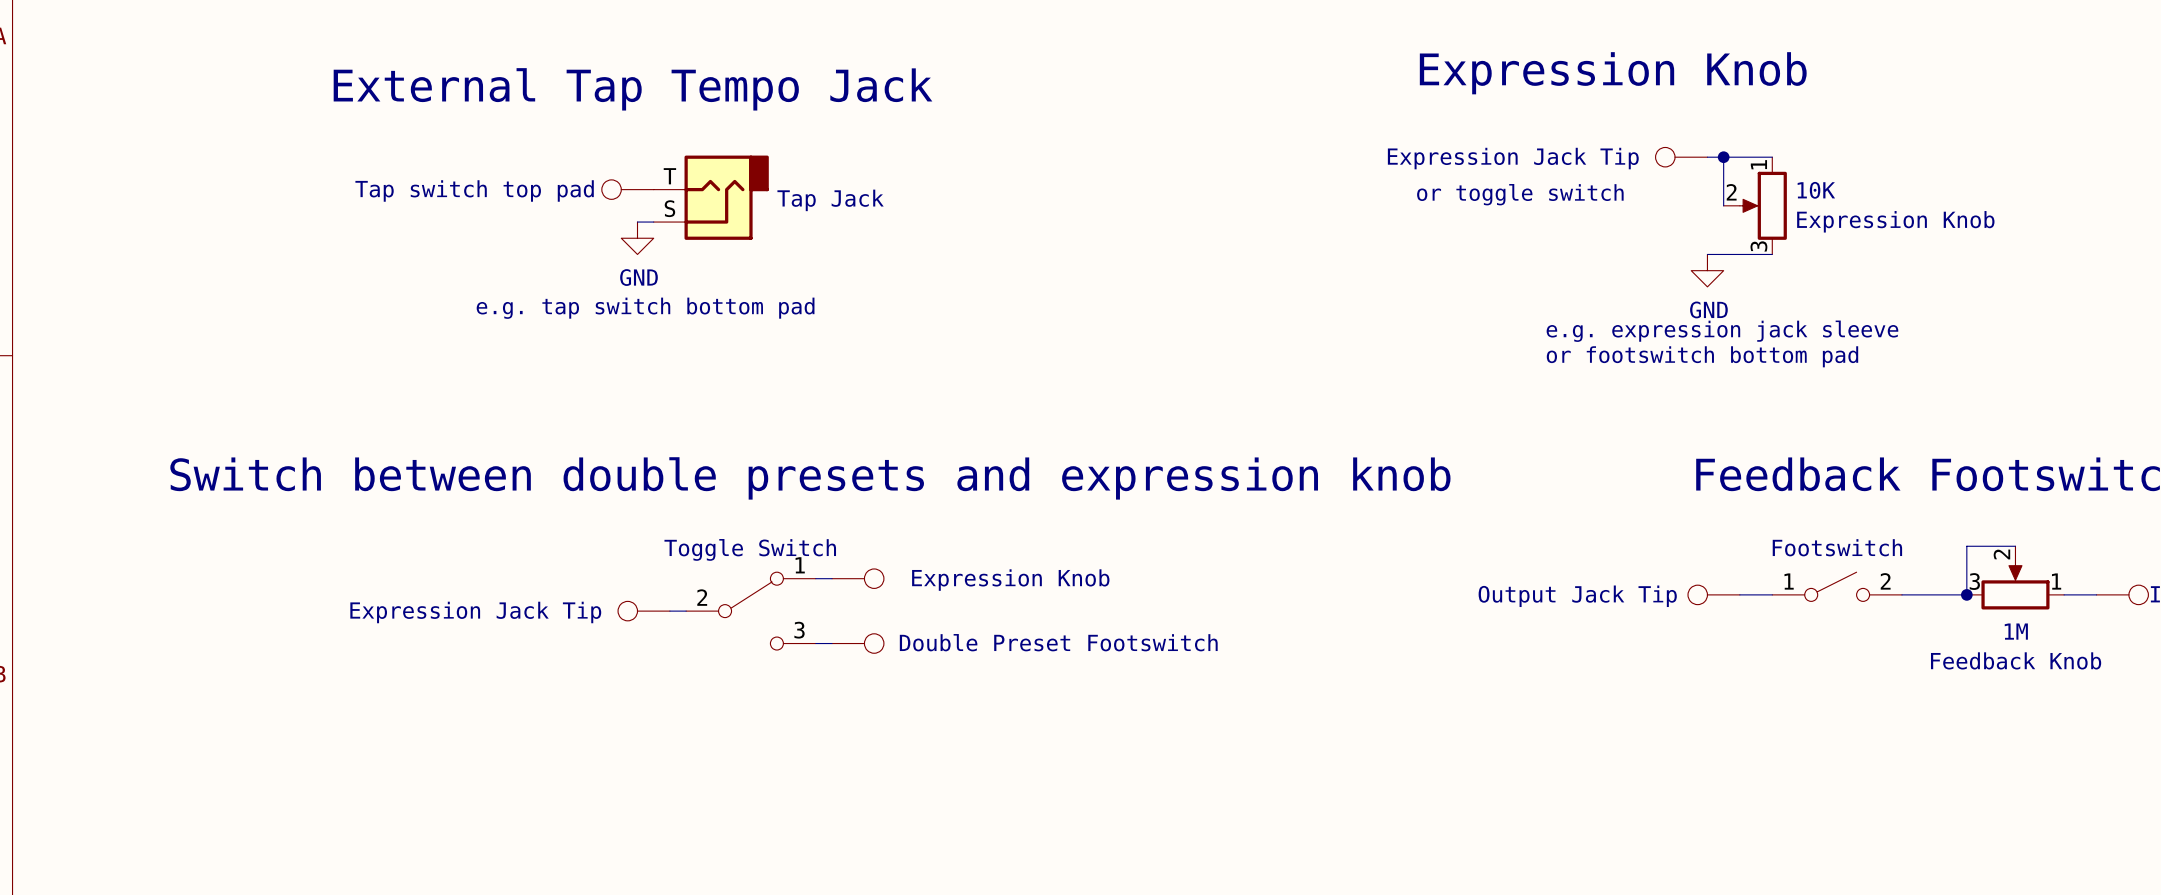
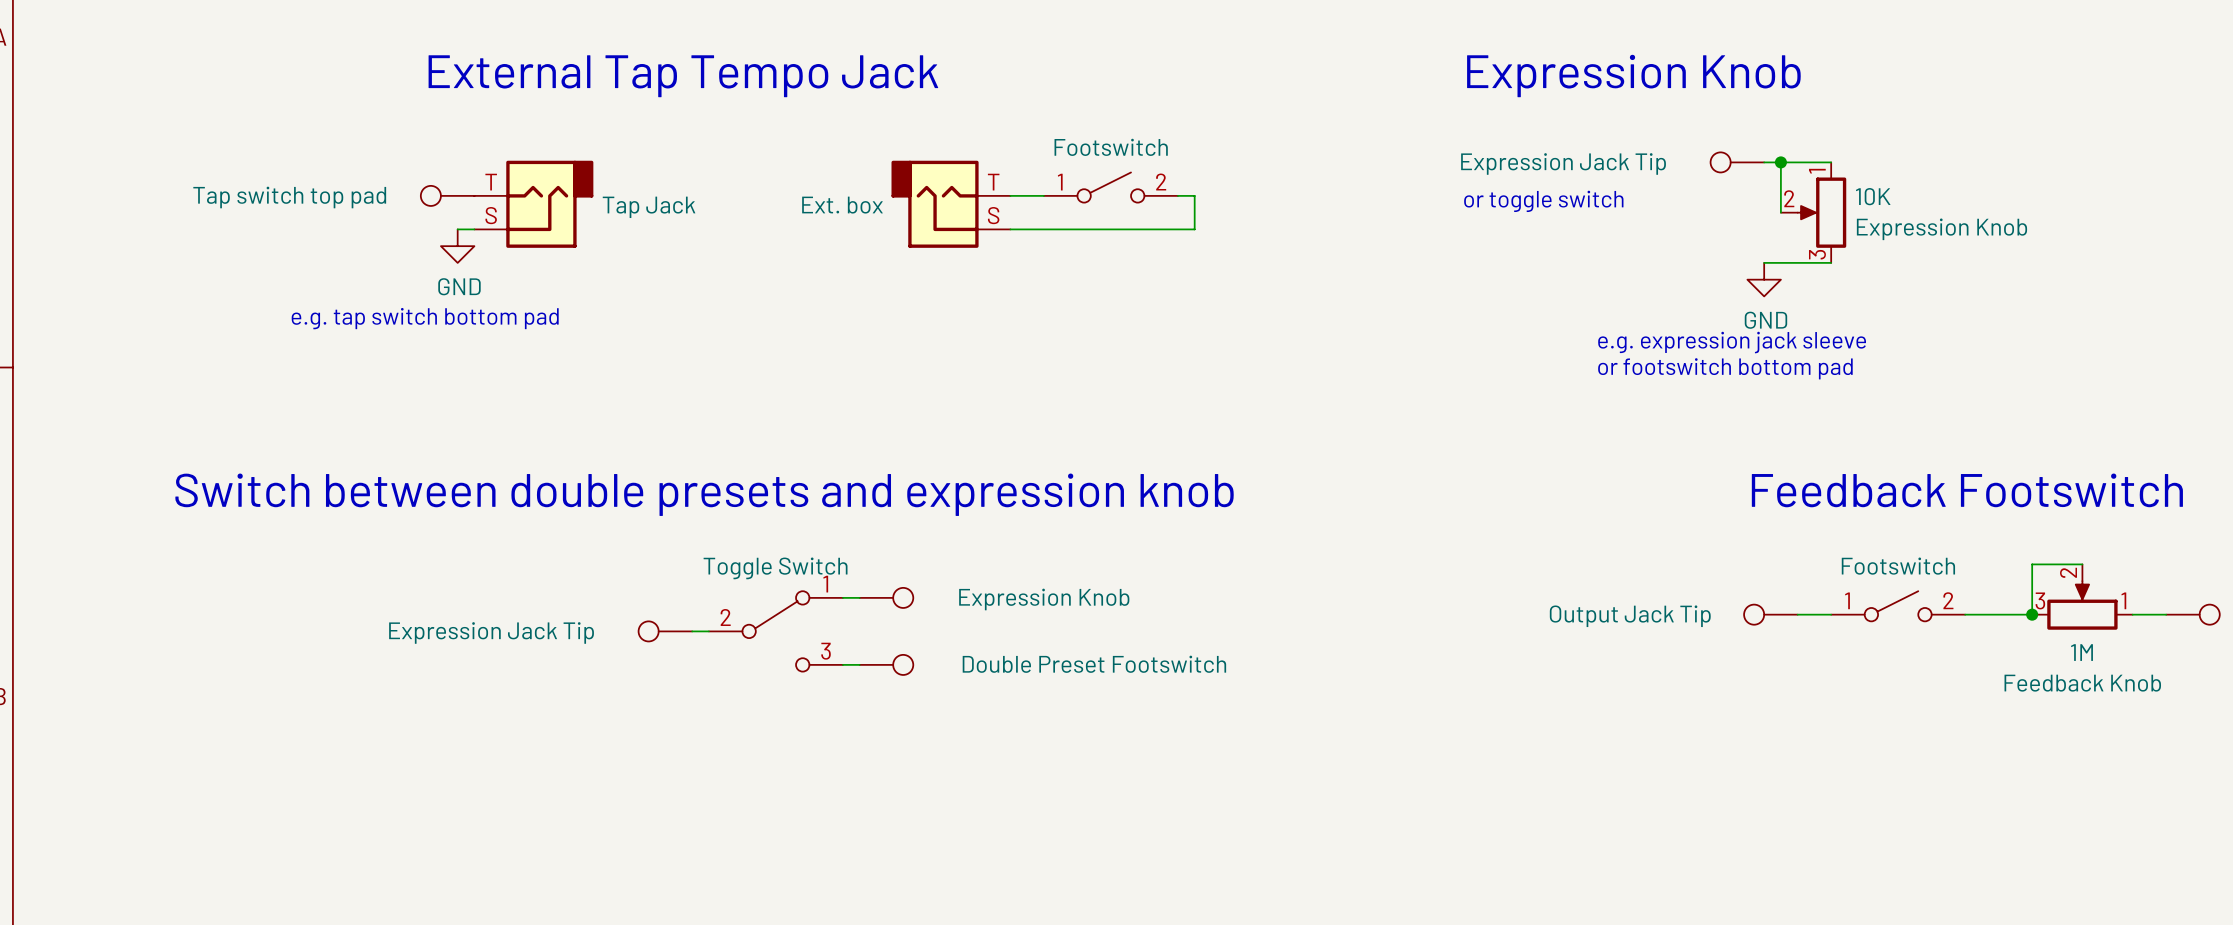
text position: External Tap Tempo Jack (633, 89) -> External Tap Tempo Jack (683, 76)
part: none -> Footswitch (1110, 187)
part position: (627, 189) -> (447, 195)
wire: none -> (1010, 195) (1043, 195)
wire: none -> (1177, 195) (1194, 195) (1194, 229) (1010, 229)
part position: (711, 197) -> (533, 204)
part: none -> Ext. box (950, 204)
wire: (637, 222) (653, 222) -> (457, 229) (474, 229)
power symbol position: GND (637, 238) -> GND (457, 246)
text position: e.g. tap switch bottom pad (645, 308) -> e.g. tap switch bottom pad (425, 318)

